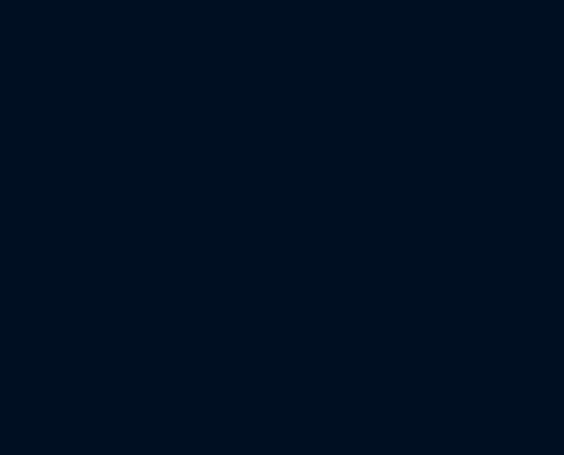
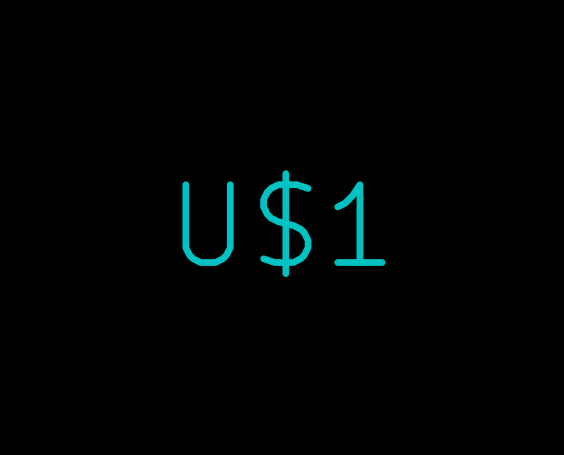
text: none -> U$1 (283, 223)

